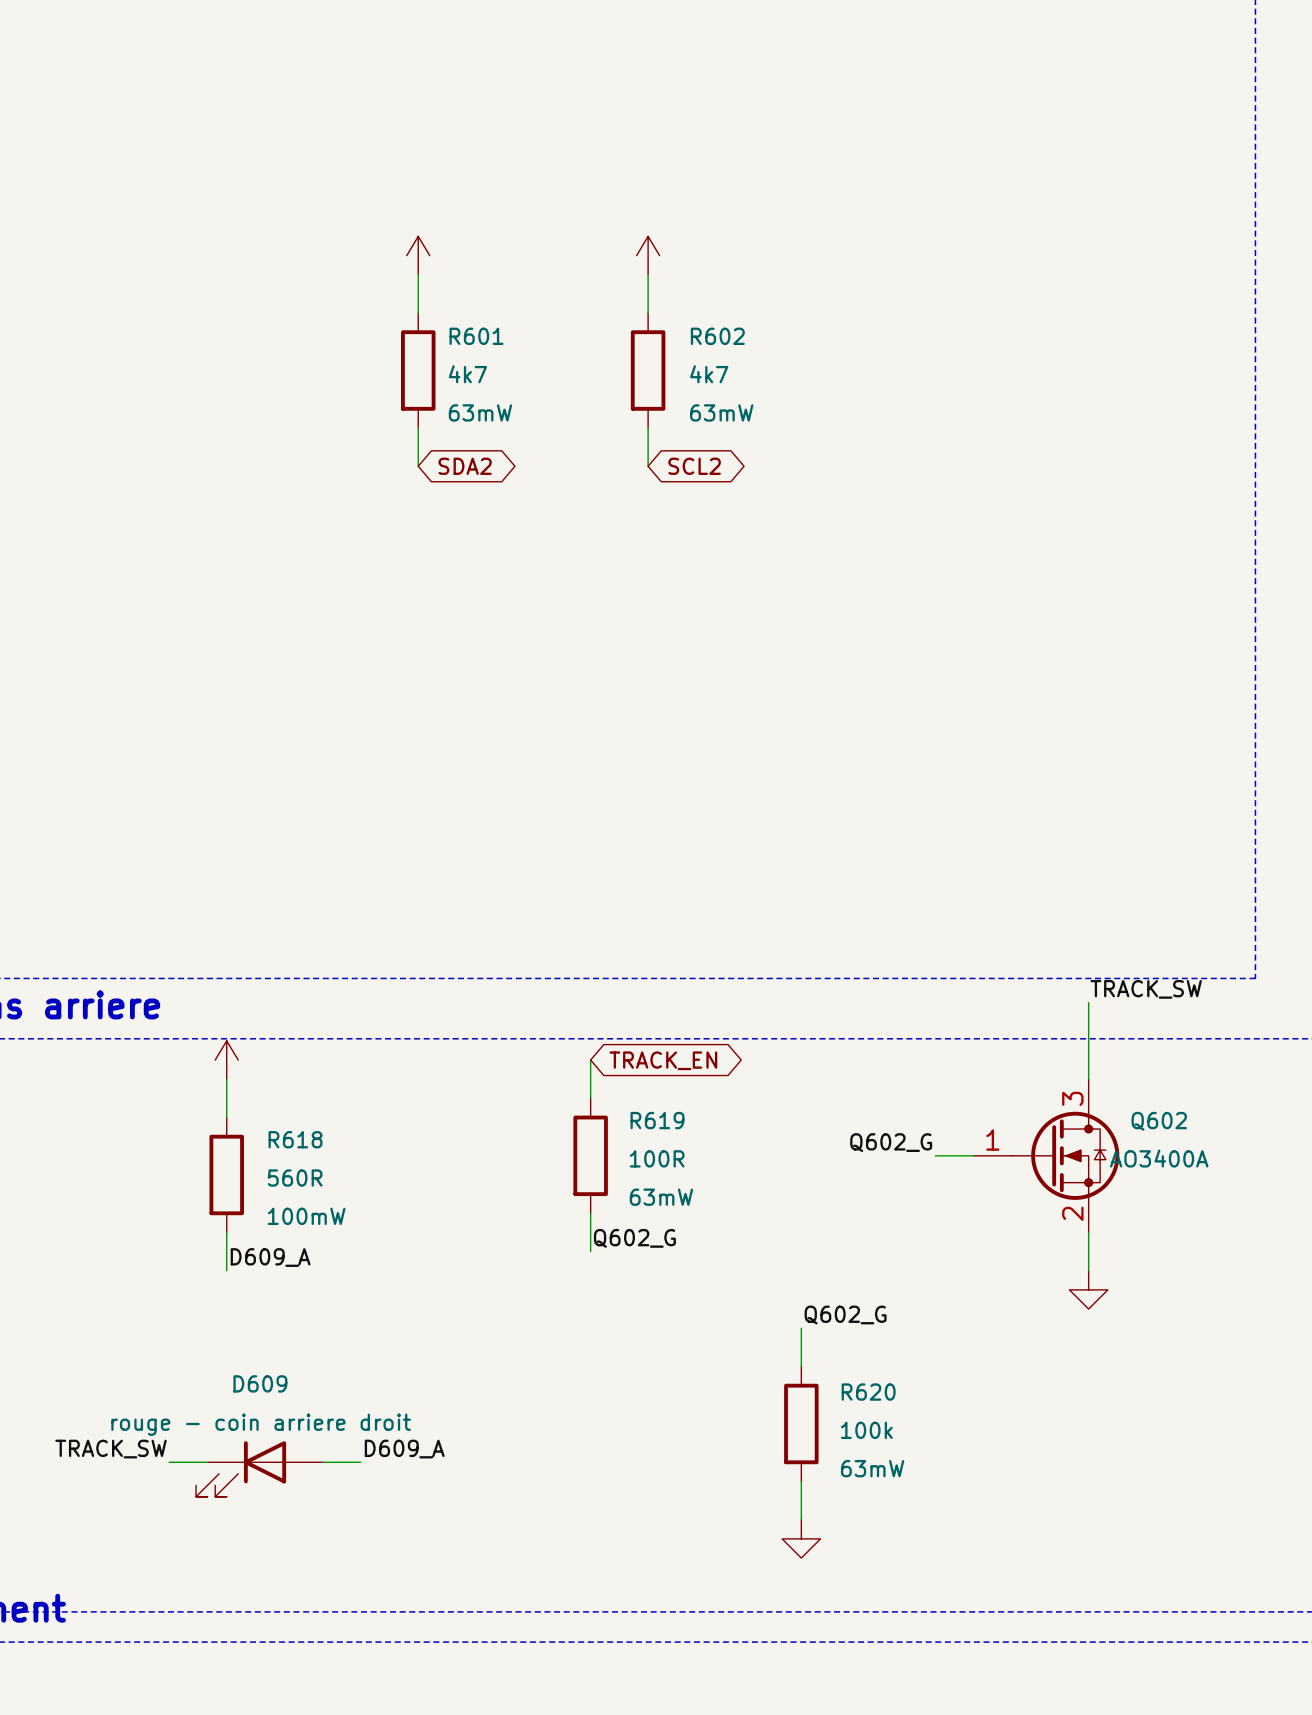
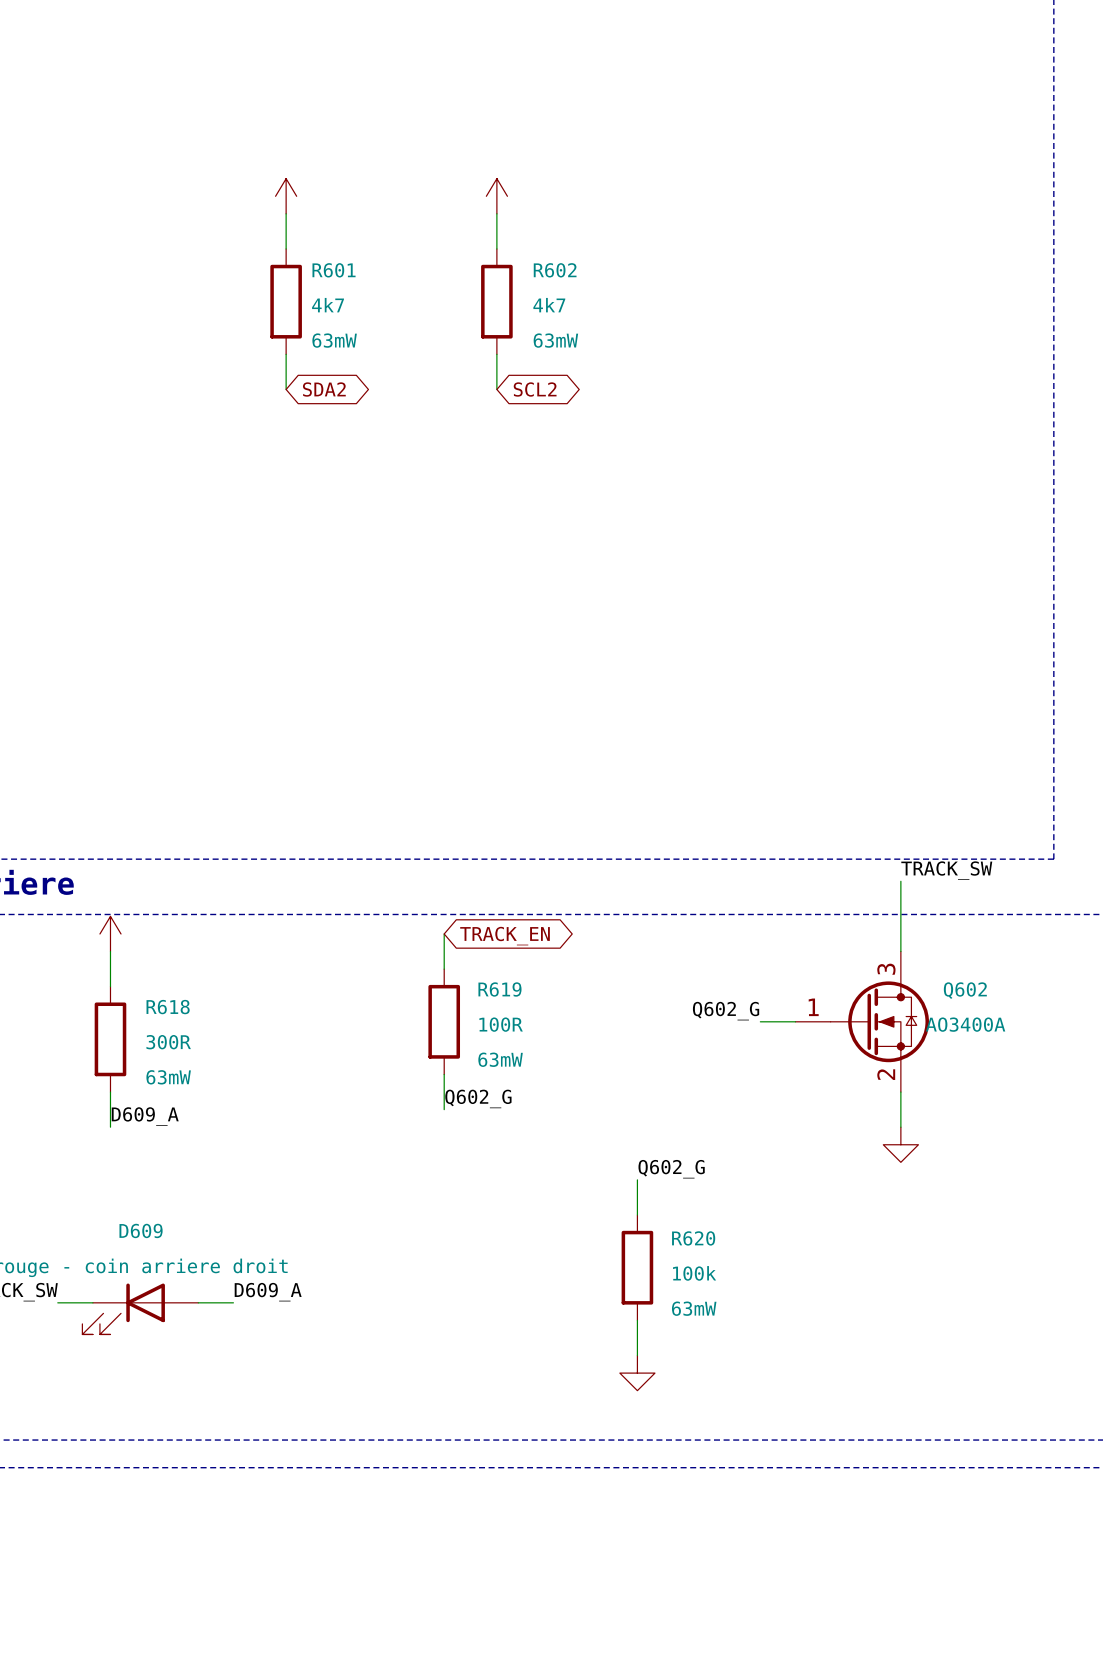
R618 value: 560R (295, 1178) -> 300R (168, 1042)
R618 text: 100mW (306, 1216) -> 63mW (168, 1077)

